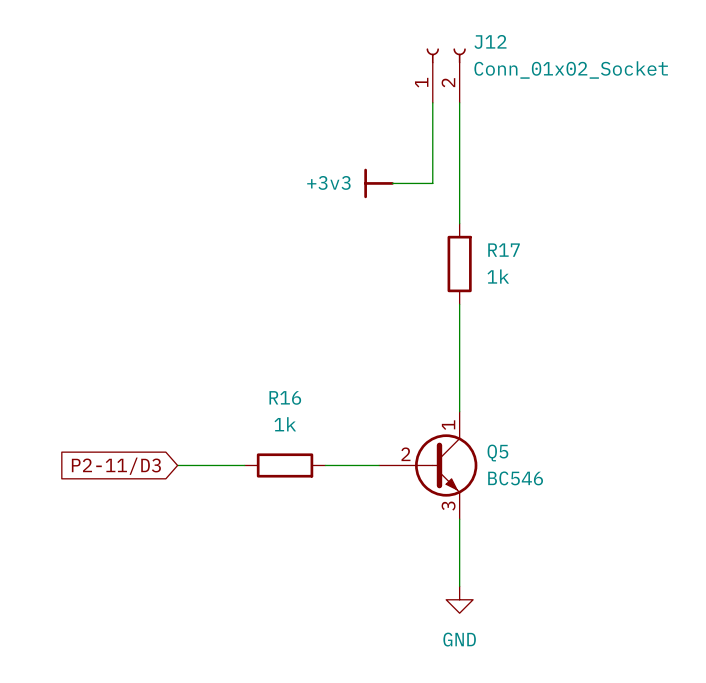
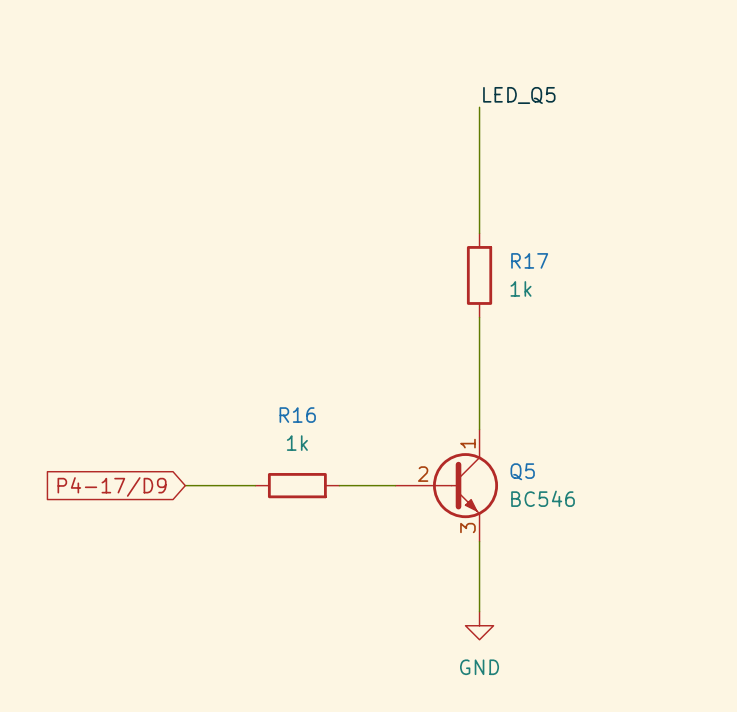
J12: Conn_01x02_Socket (446, 75) -> none
label: none -> LED_Q5 (519, 95)
wire: (432, 102) (432, 183) (392, 183) -> none
power symbol: +3v3 (379, 183) -> none
global label: P2-11/D3 (116, 466) -> P4-17/D9 (112, 486)

